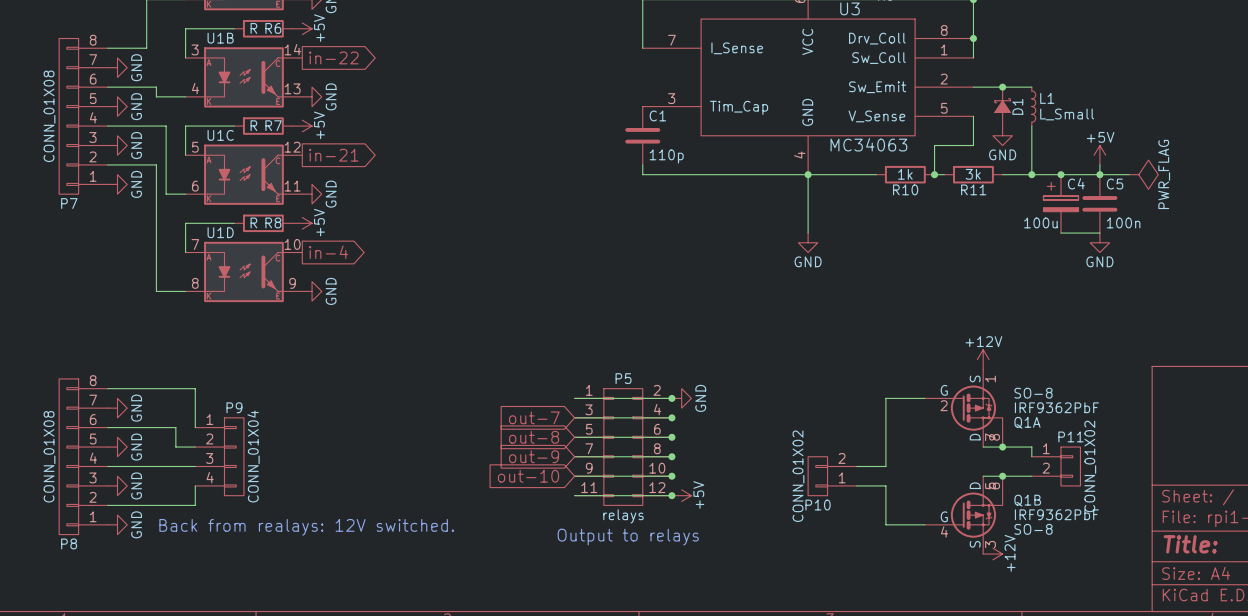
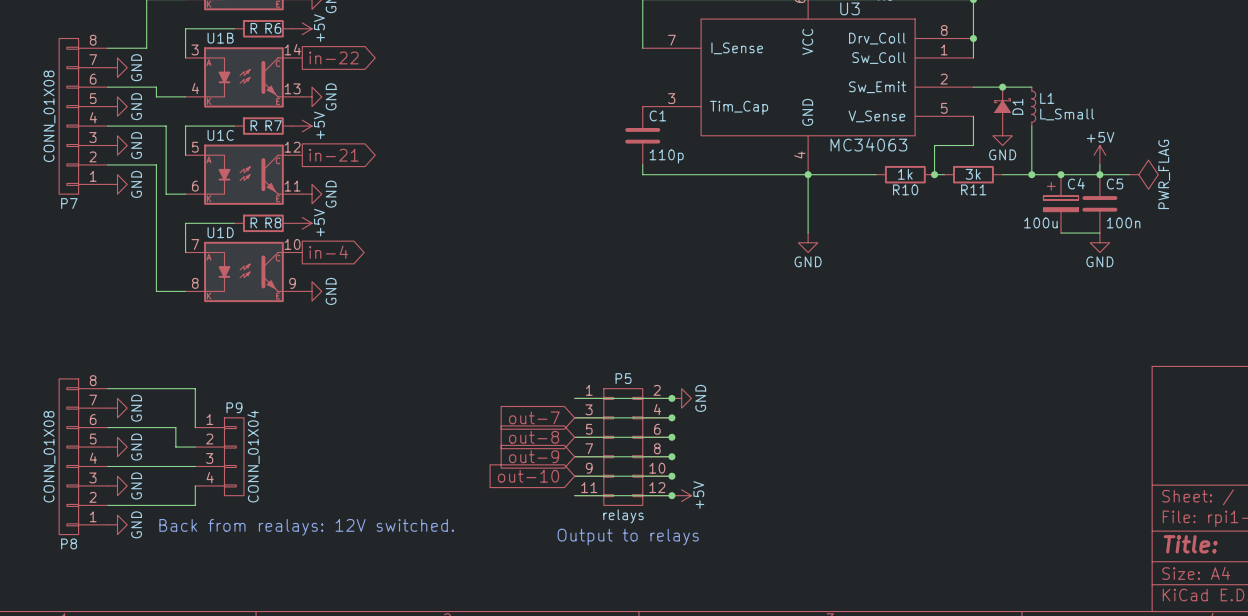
power symbol: +12V (983, 359) -> none
wire: (924, 398) (885, 398) (885, 466) (856, 466) -> none
Q1A: IRF9362PbF (963, 408) -> none
wire: (983, 447) (1031, 447) (1031, 456) -> none
junction: (1002, 447) -> none
P11: CONN_01X02 (1056, 466) -> none
P10: CONN_01X02 (832, 476) -> none
wire: (983, 476) (1031, 476) -> none
junction: (1002, 476) -> none
wire: (856, 485) (885, 485) (885, 524) (924, 524) -> none
Q1B: IRF9362PbF (963, 515) -> none
power symbol: +12V (992, 554) -> none

